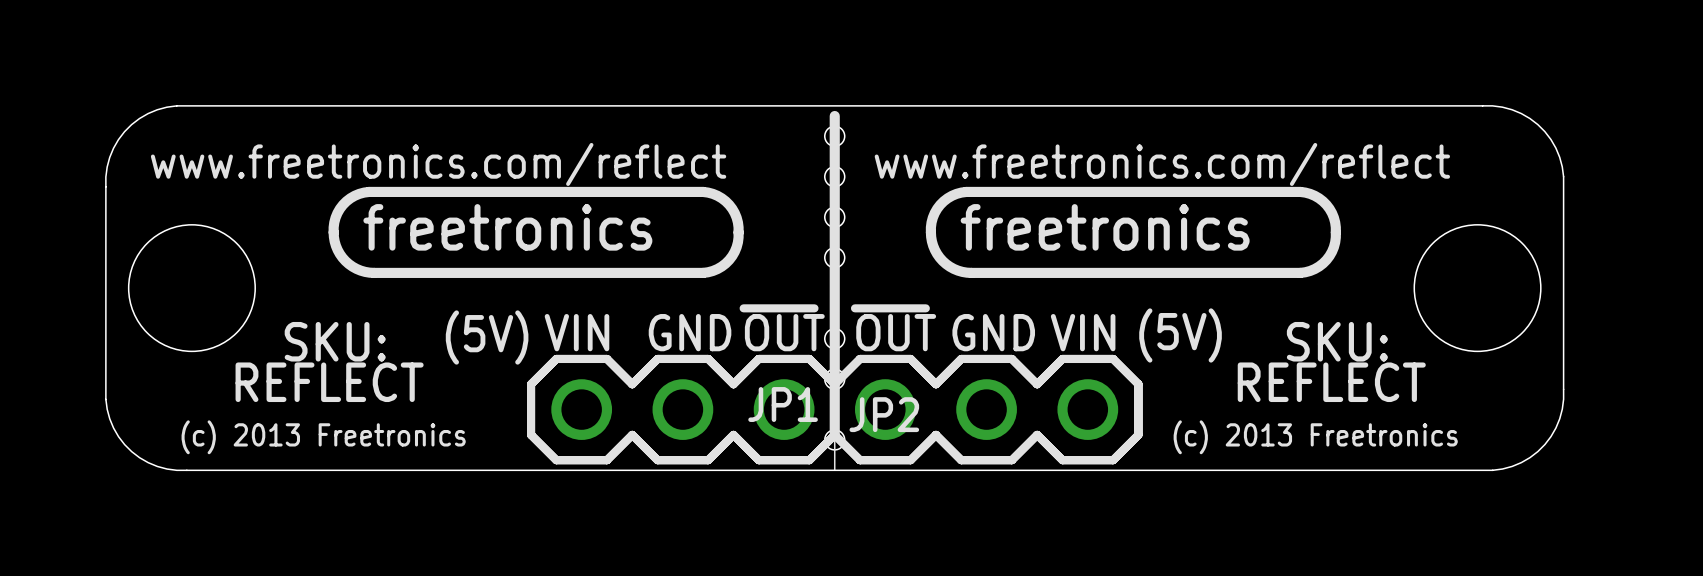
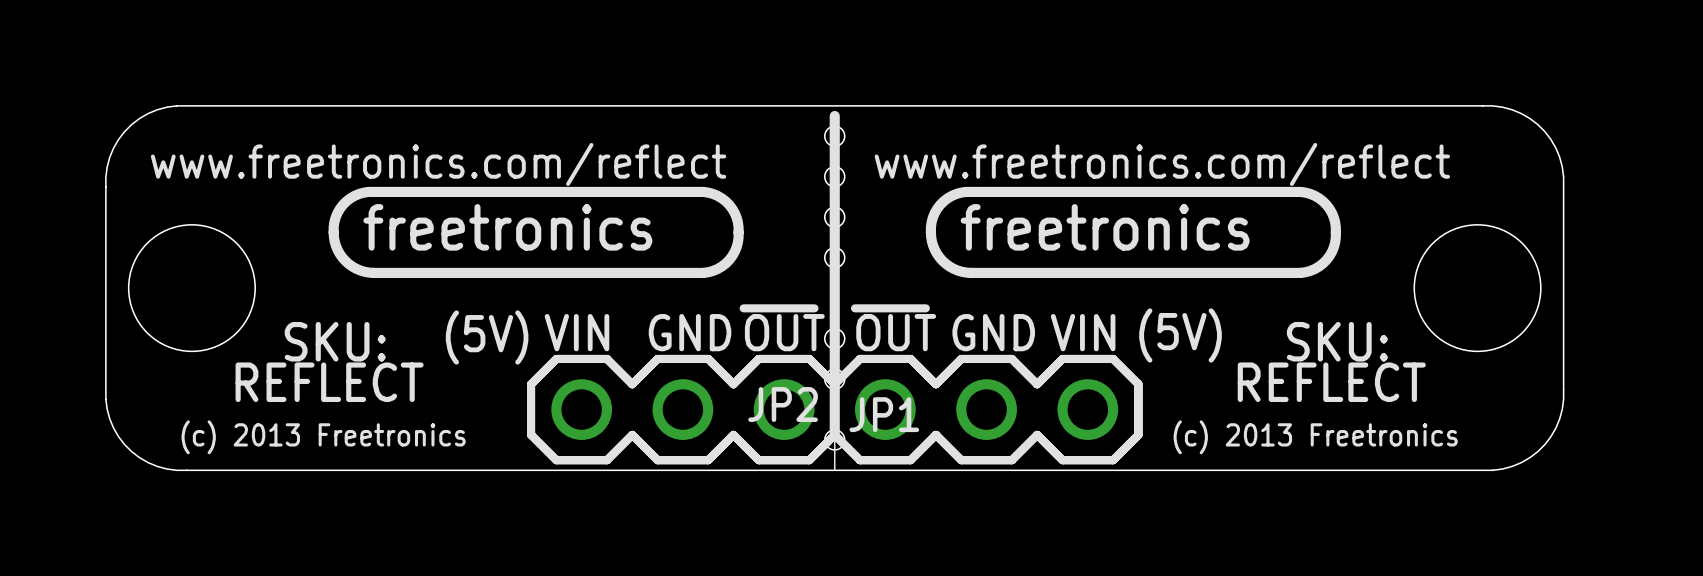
JP1 name: JP1 (783, 404) -> JP2 (783, 404)
JP2 name: JP2 (884, 414) -> JP1 (884, 414)

